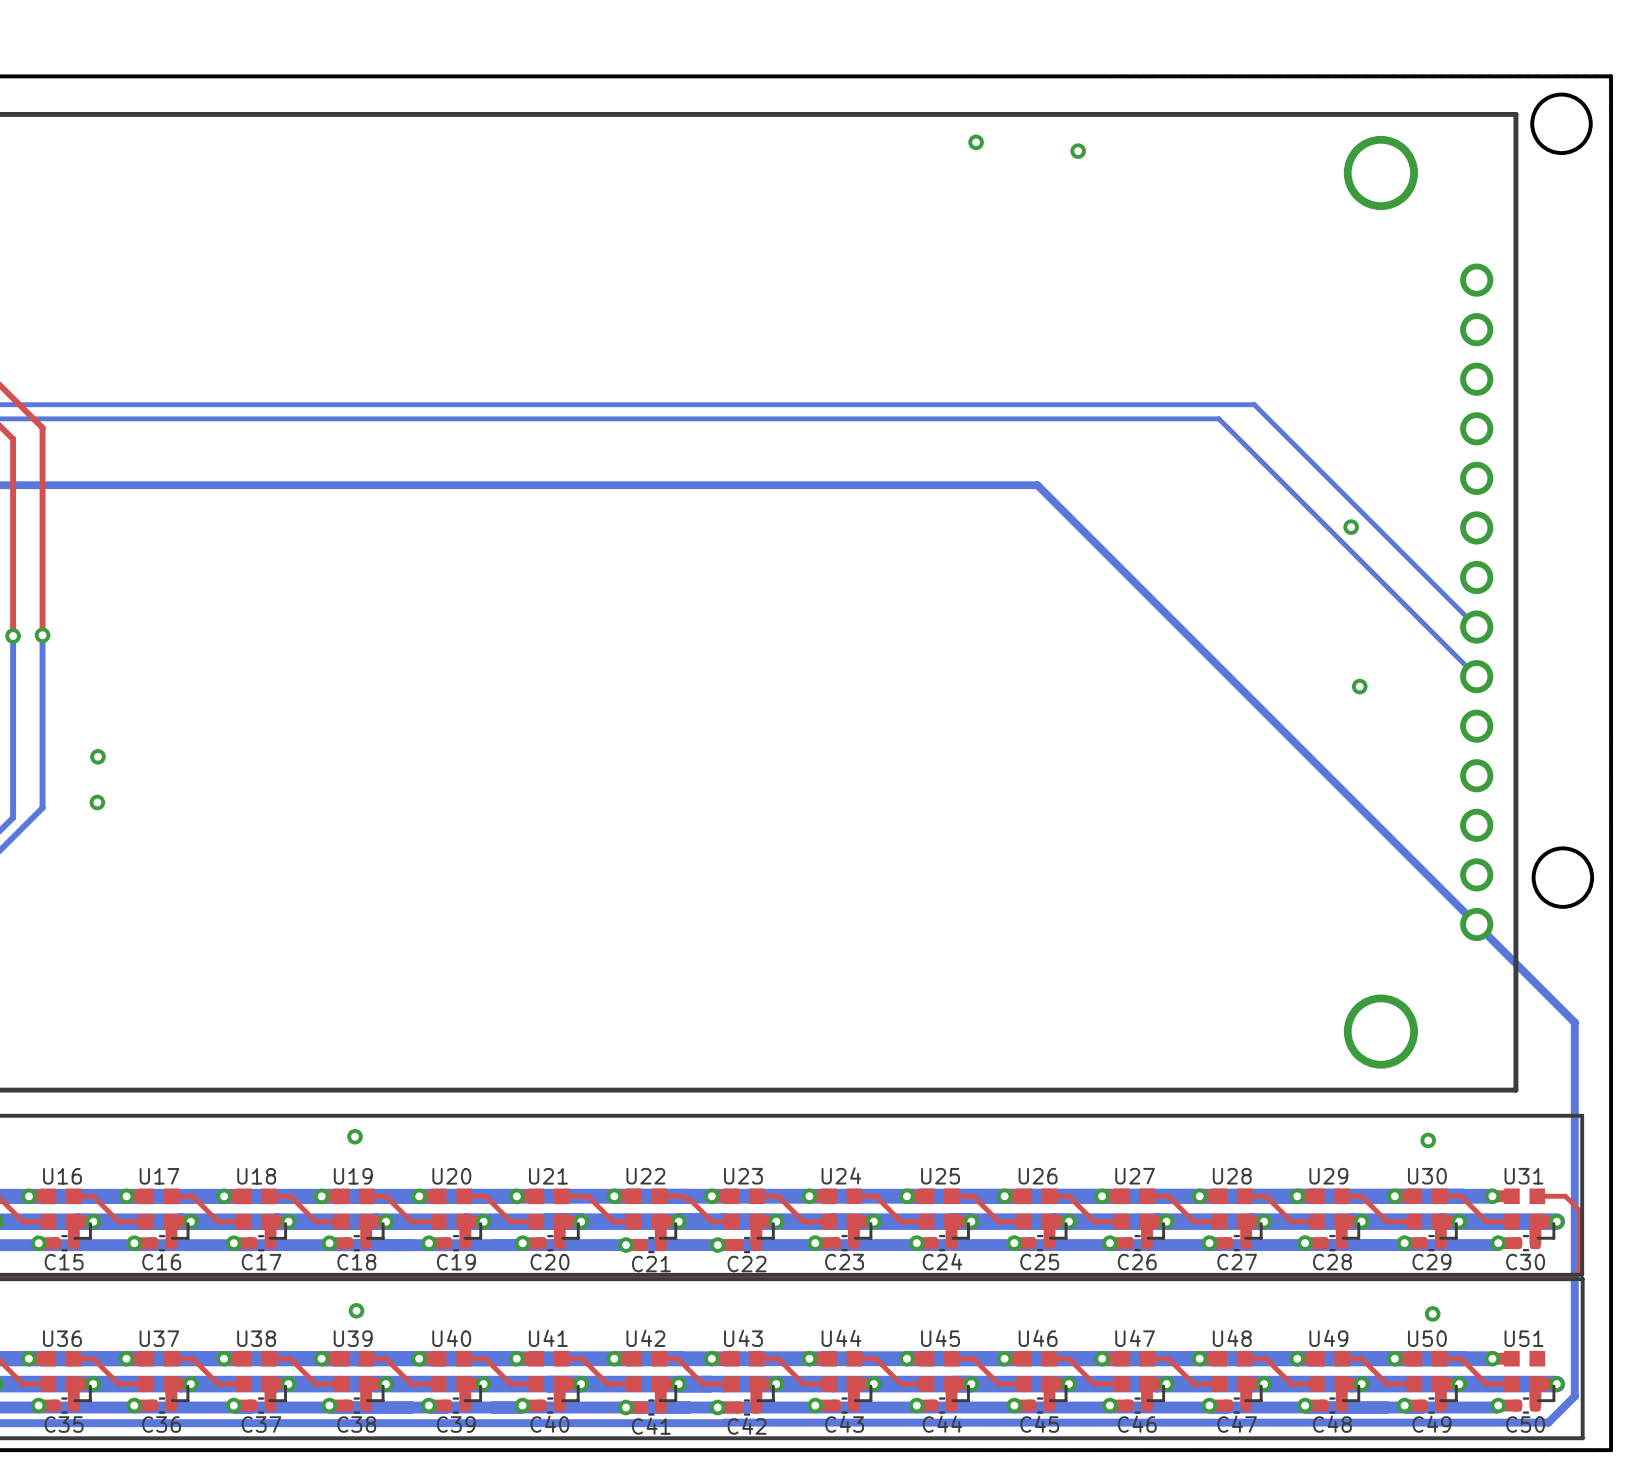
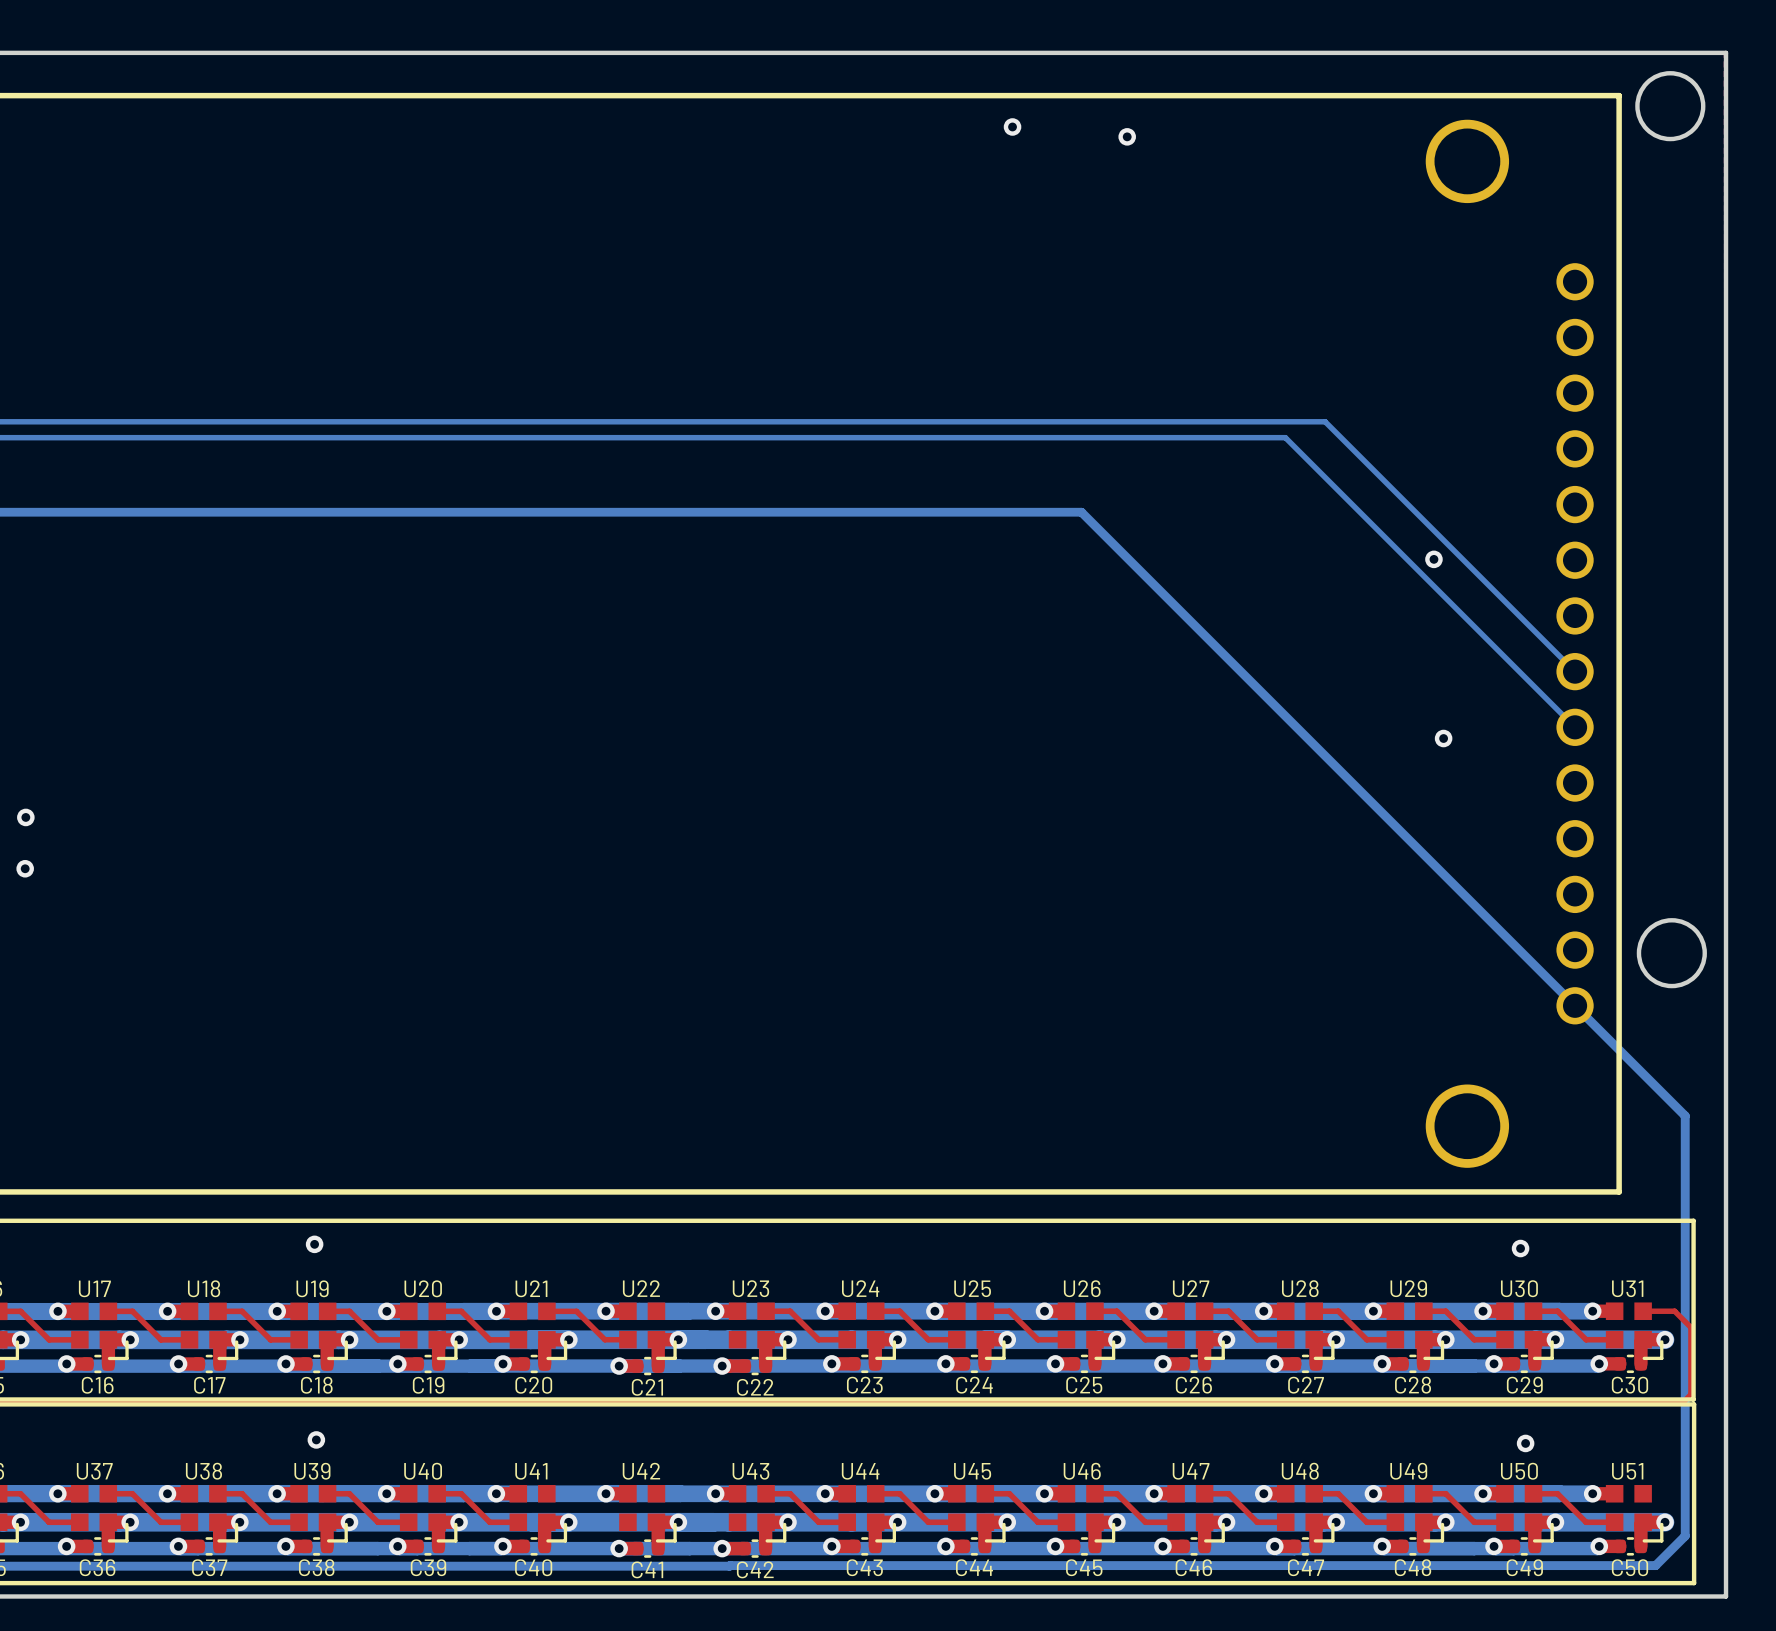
top track: (659, 1196) (682, 1196) (685, 1199) (690, 1199) (712, 1221) (731, 1221) -> none
top track: (561, 1358) (582, 1358) (607, 1384) -> none
top track: (659, 1358) (677, 1358) (703, 1384) (731, 1384) -> none
top track: (607, 1384) (633, 1384) -> none

